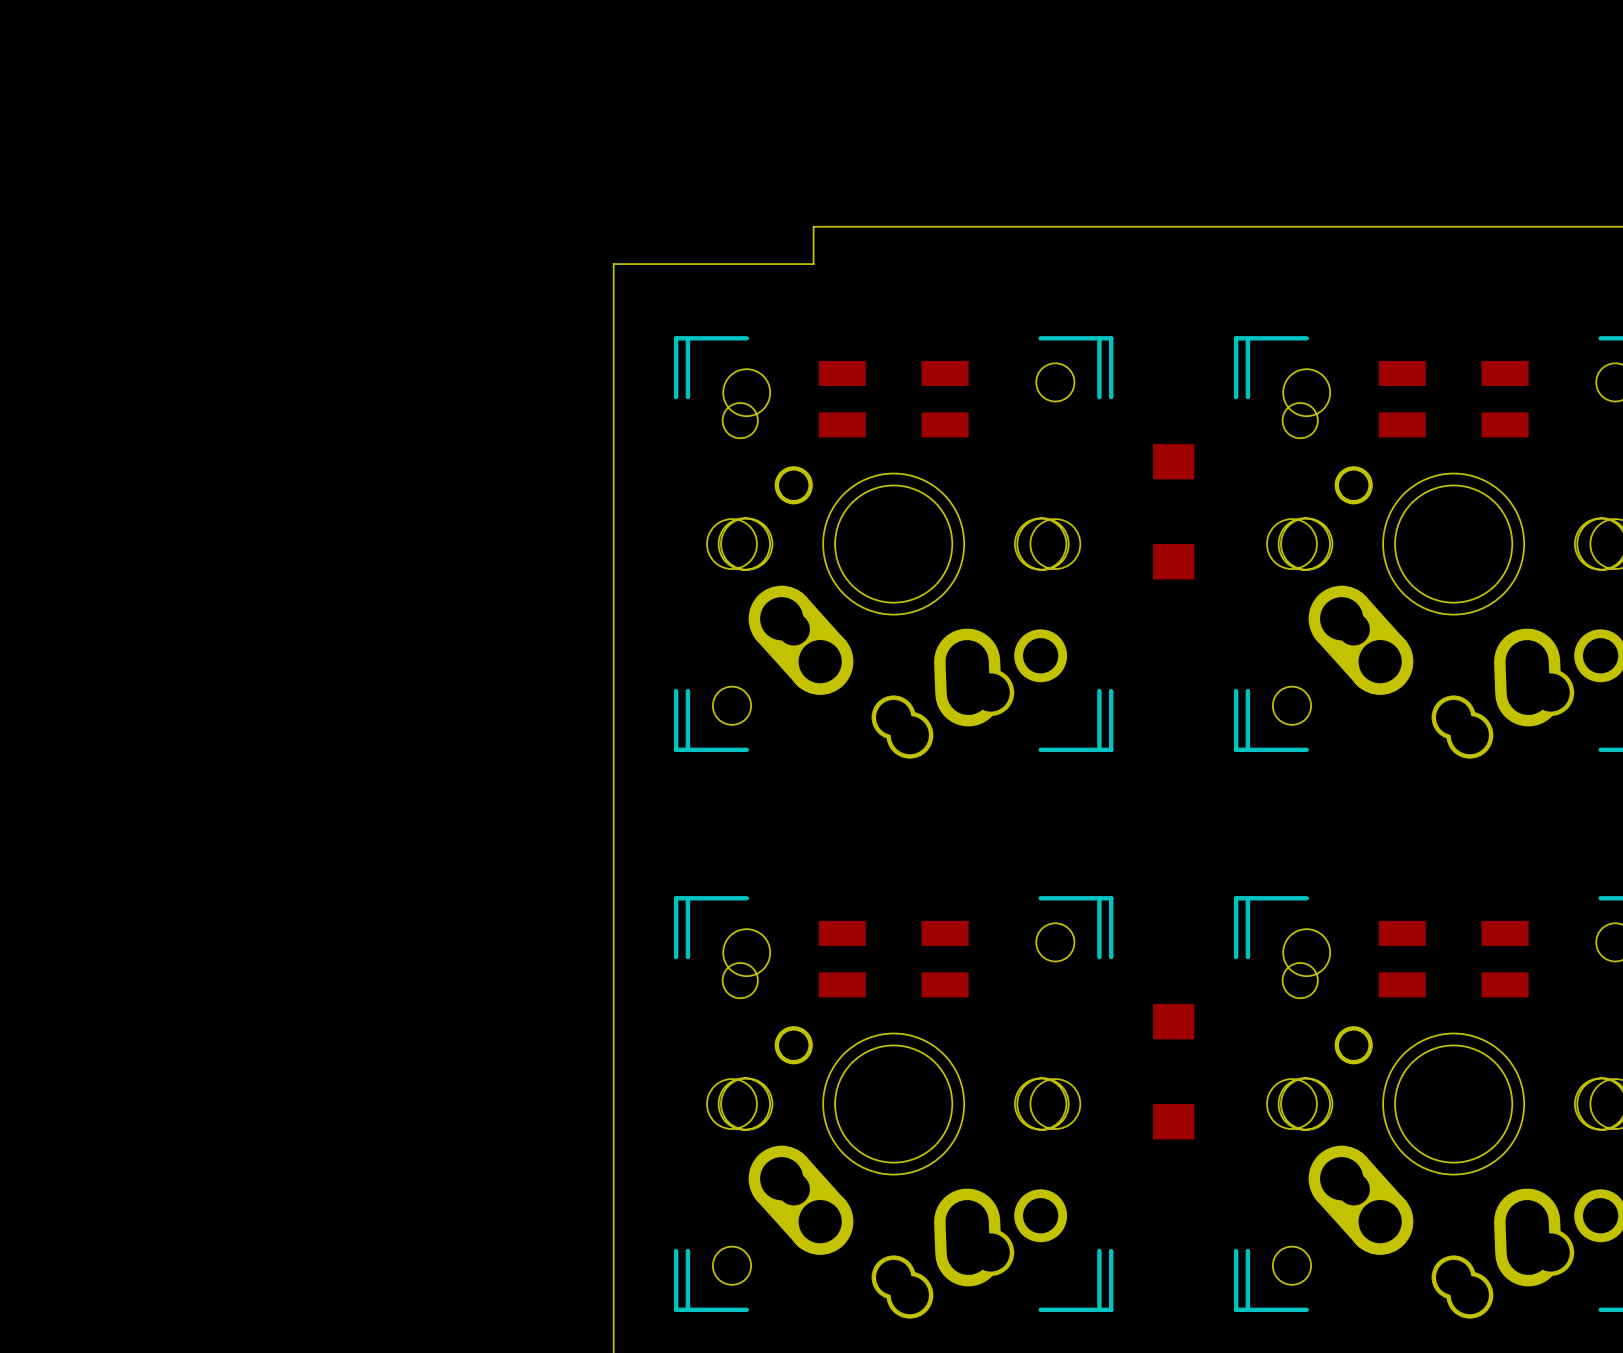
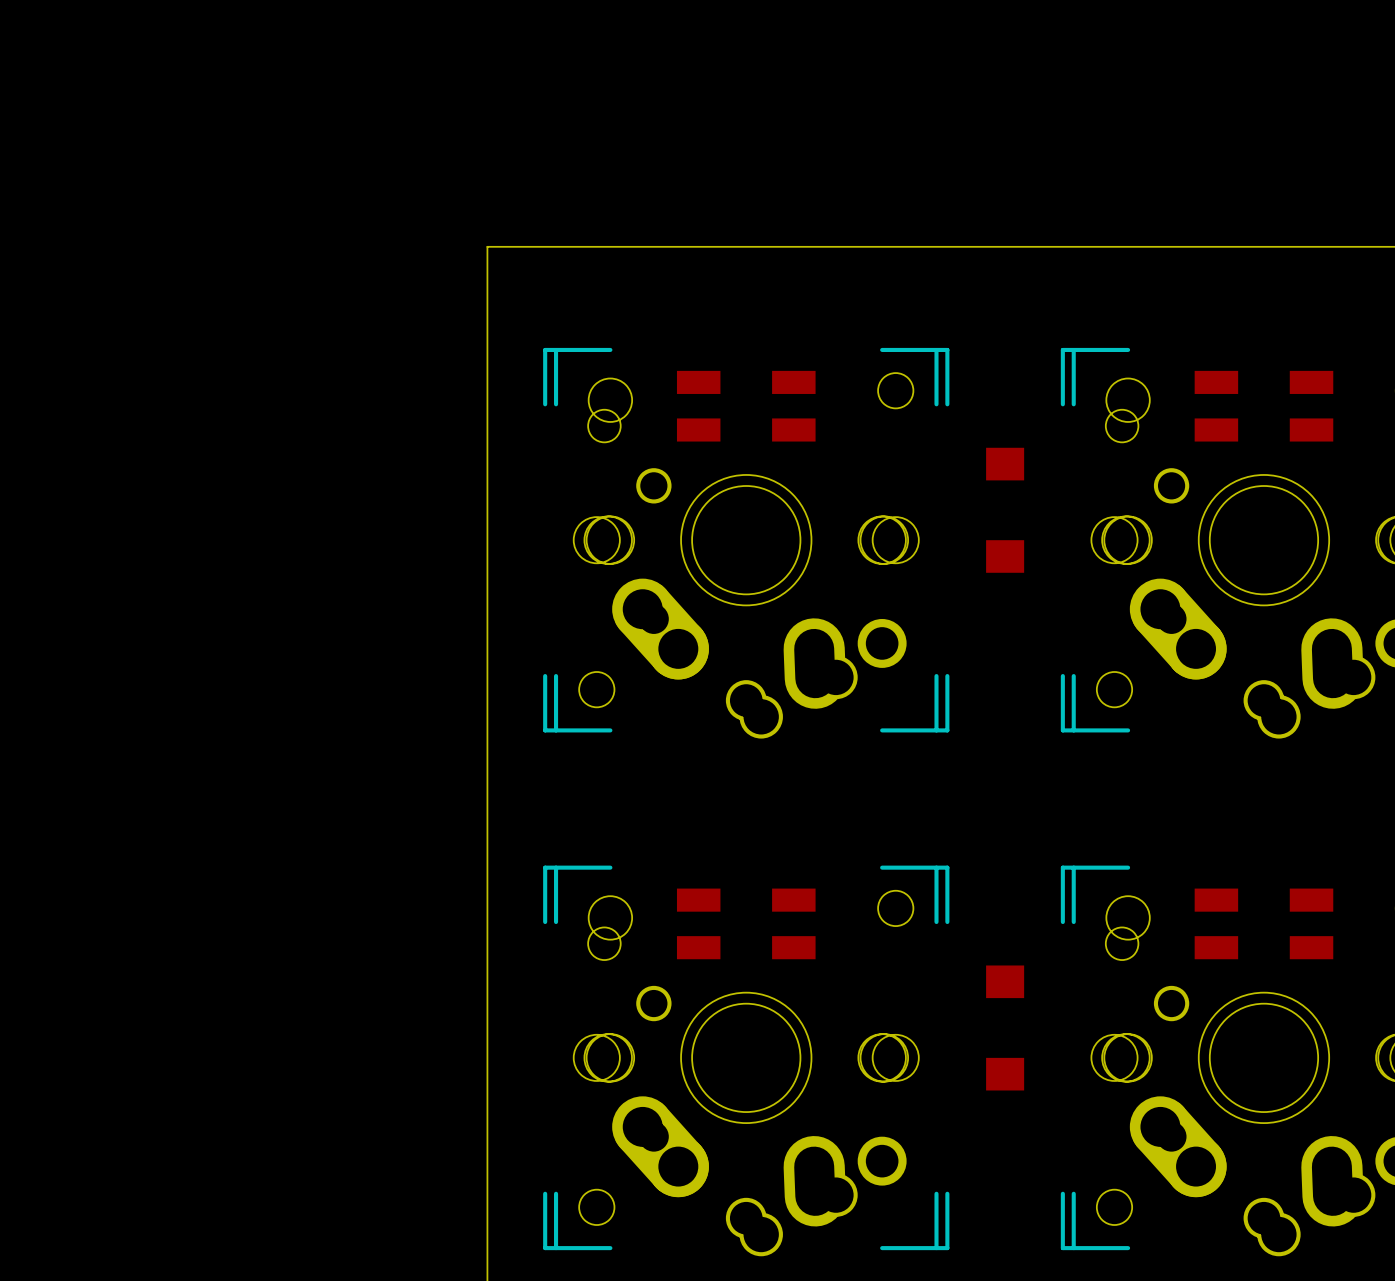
board edge: (813, 226) (813, 264) (613, 264) -> (672, 246) (487, 246) (487, 281)

